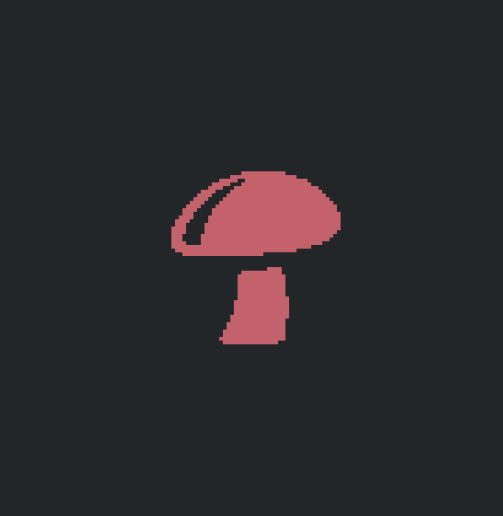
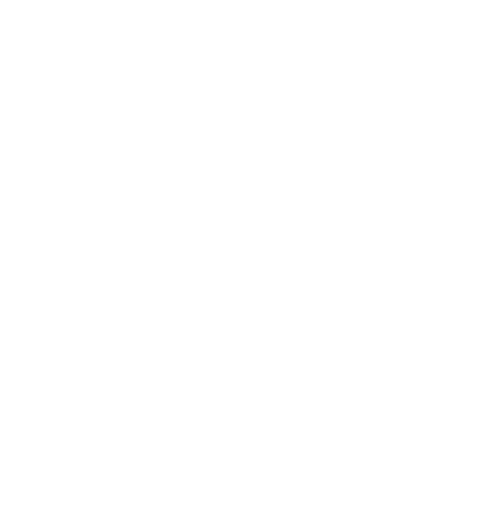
part: (255, 257) -> none

